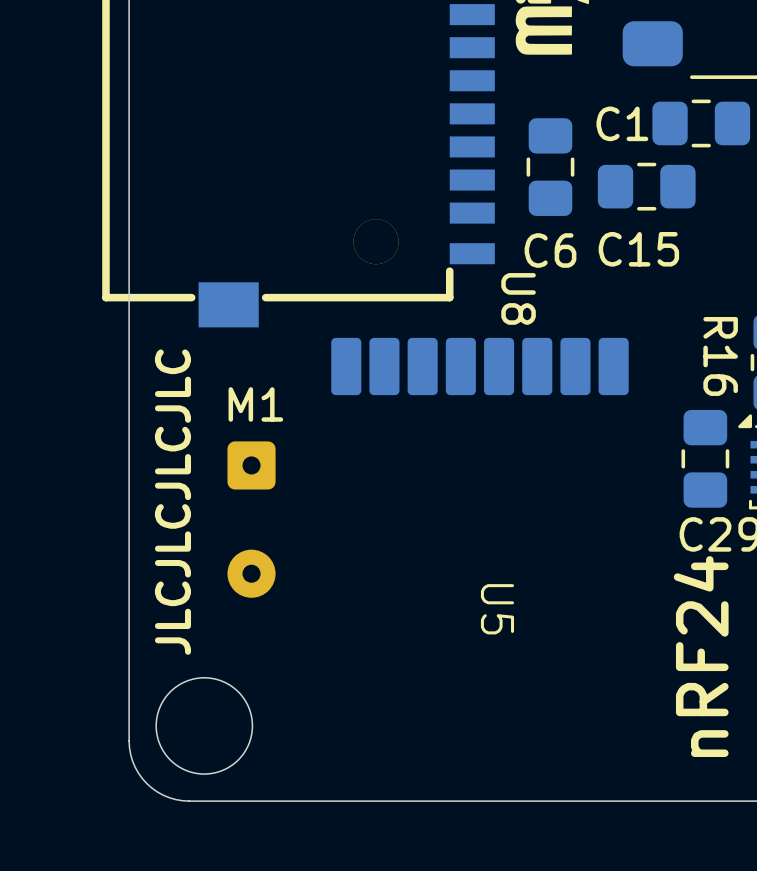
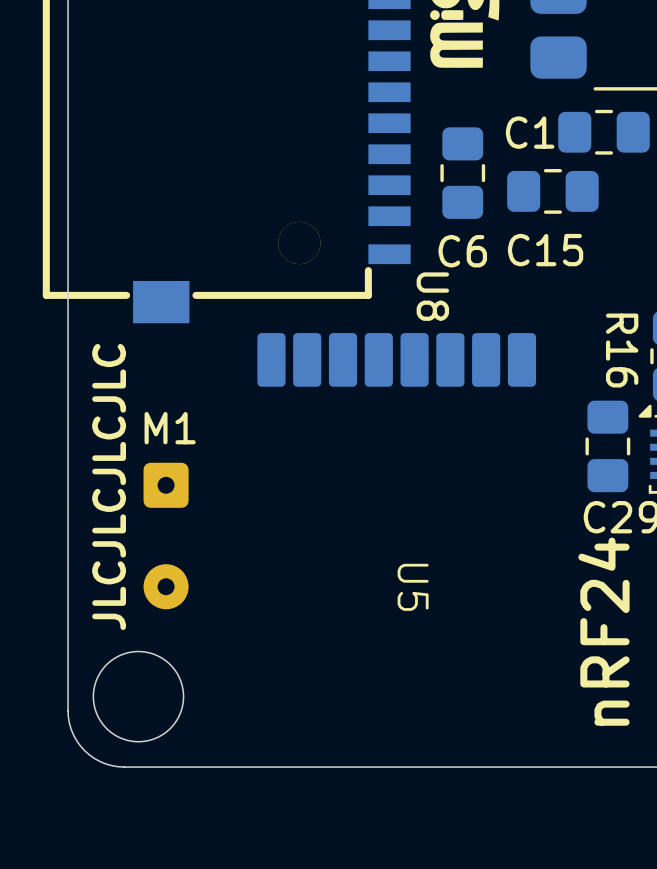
M1 position: (251, 519) -> (166, 536)

